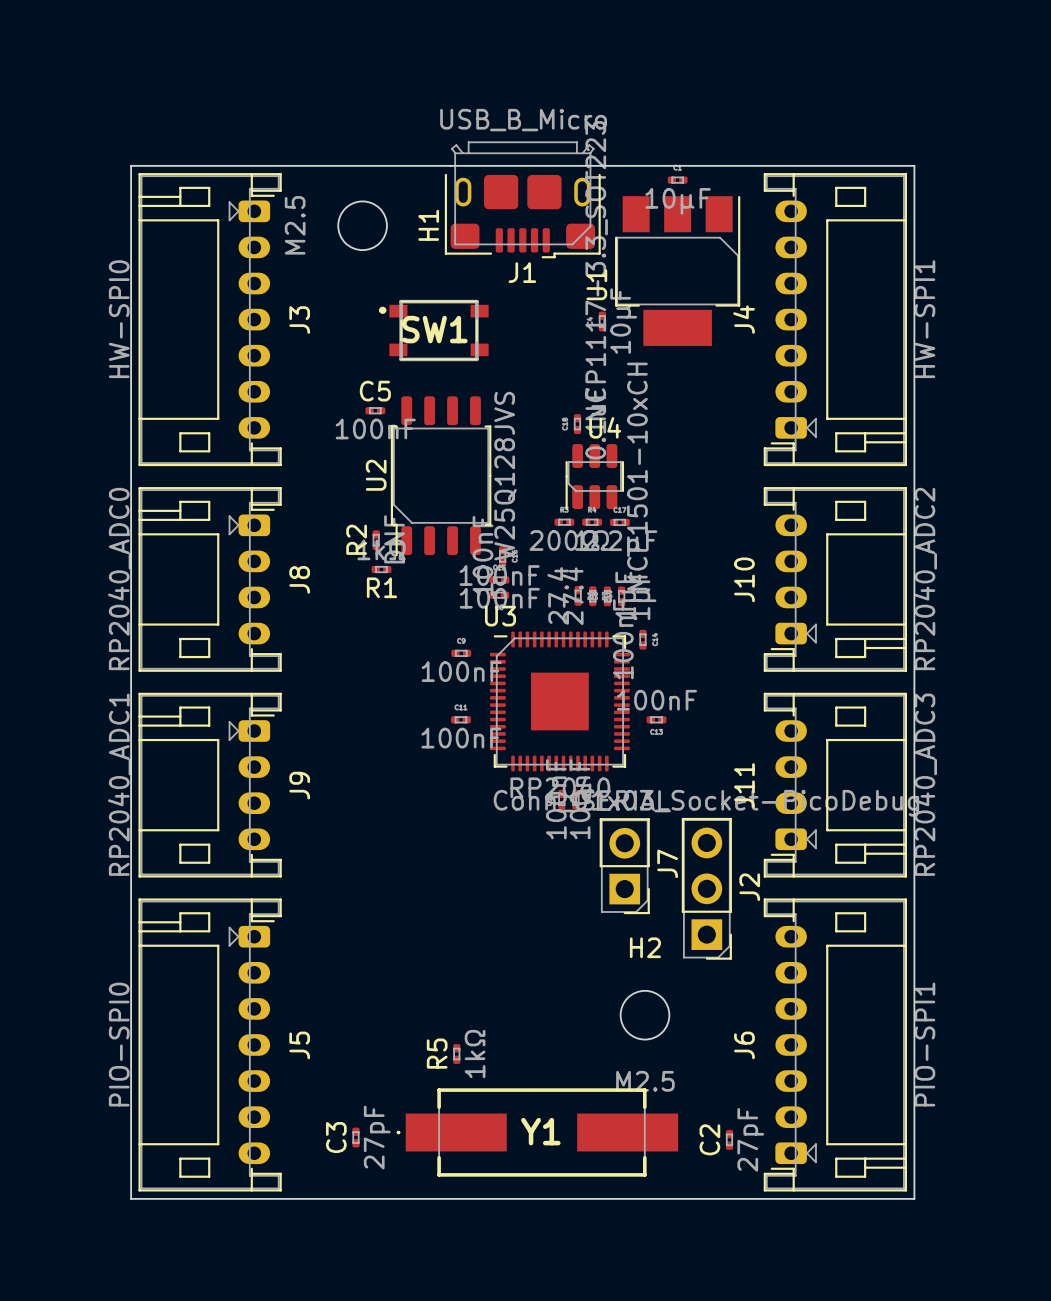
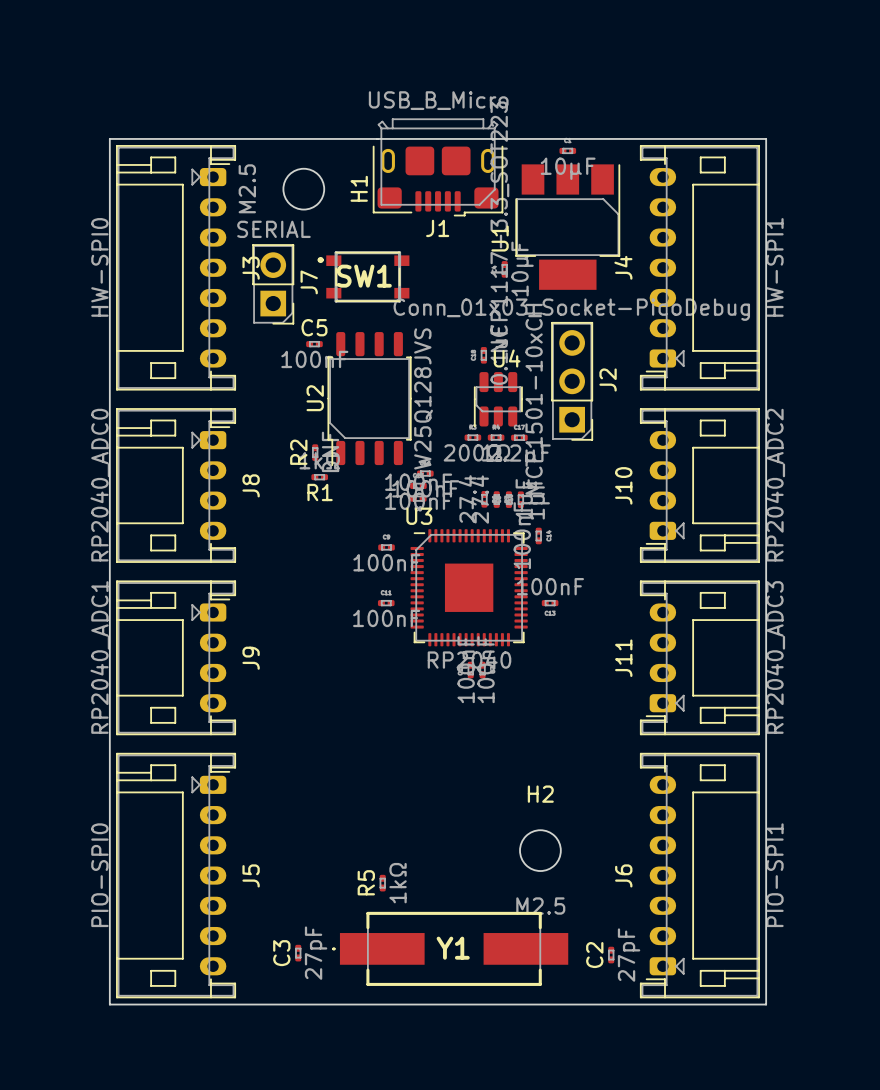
part rotation: 0° (502, 556) -> 90° clockwise (425, 473)
J7 position: (624, 866) -> (273, 284)
J2 position: (706, 888) -> (572, 381)

